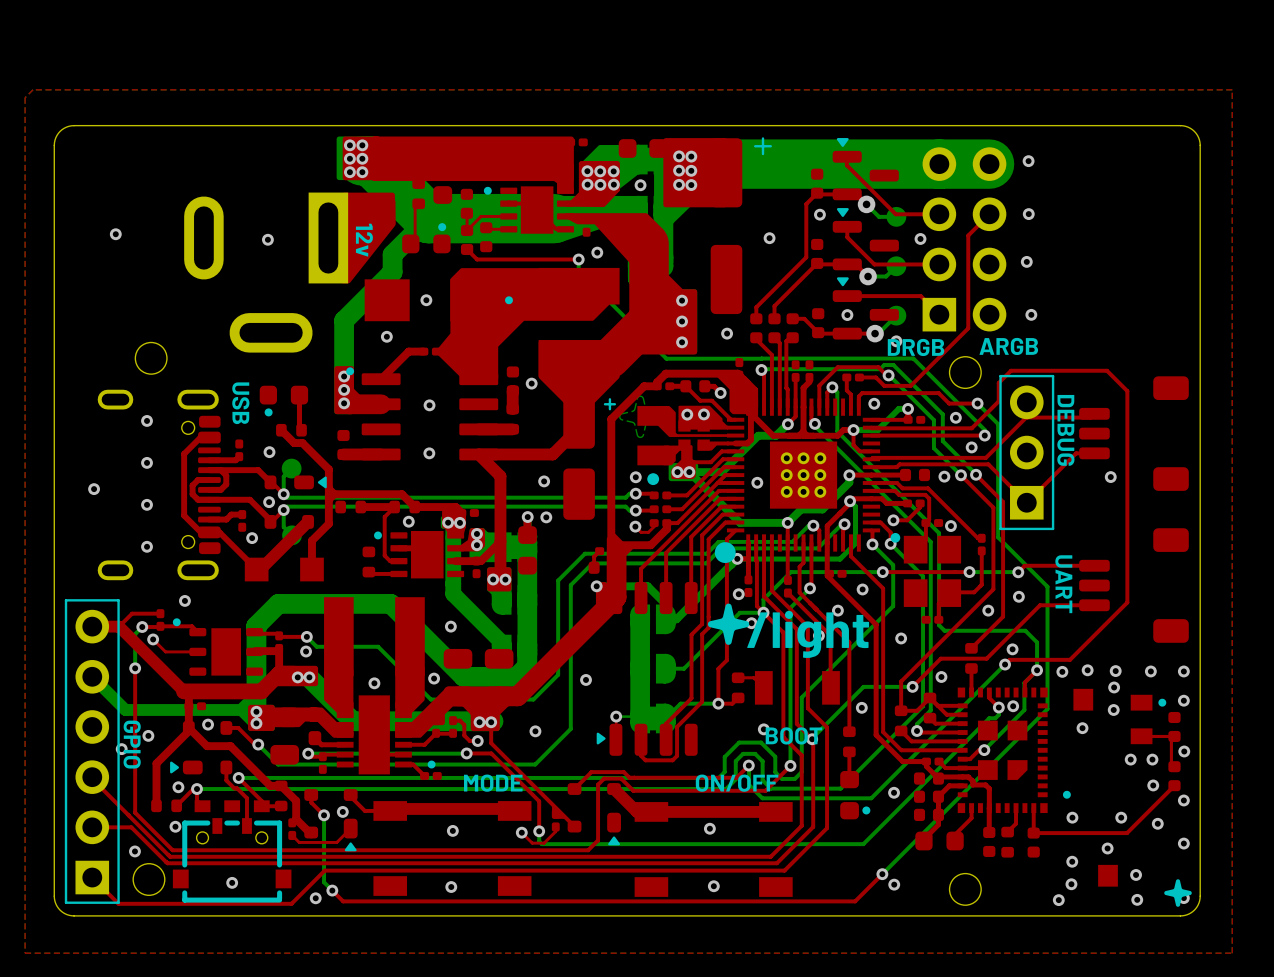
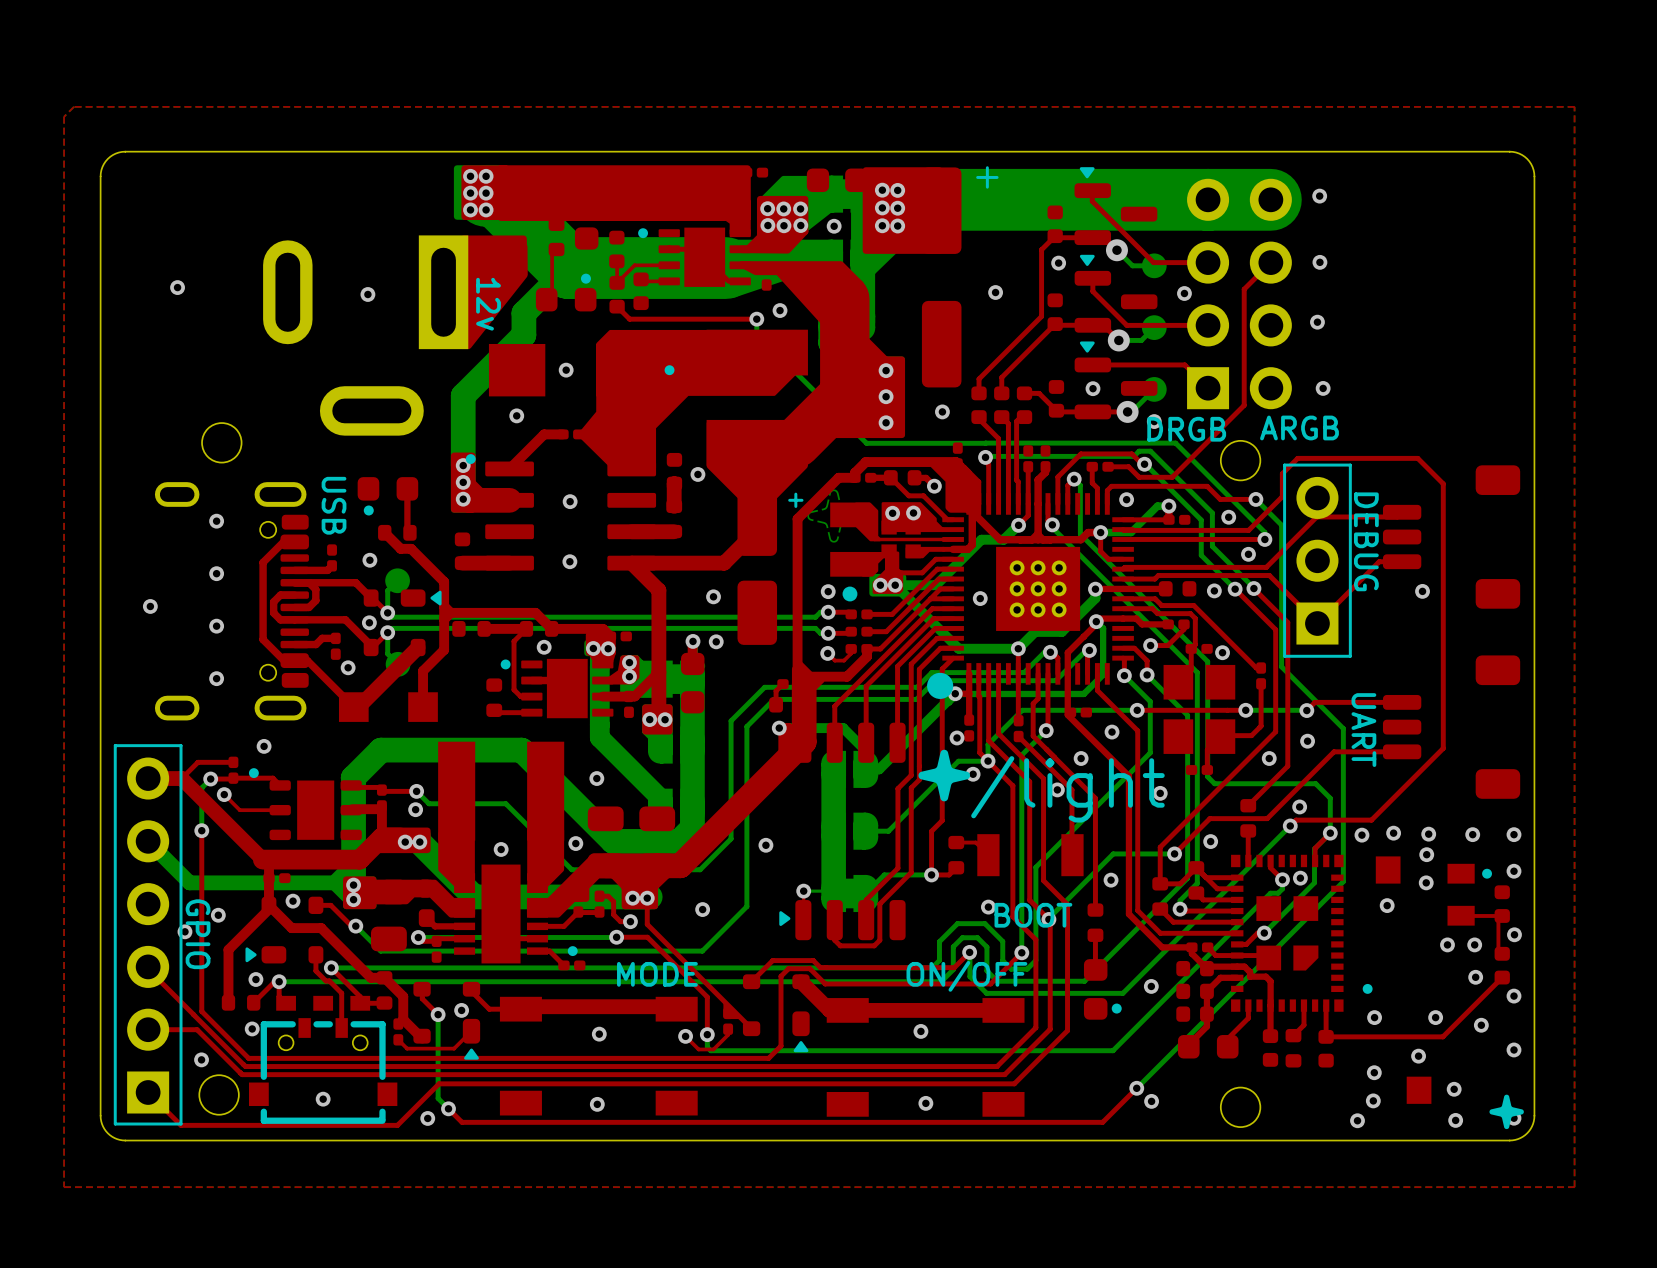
part footprint: [890, 532, 962, 607] -> [1163, 664, 1236, 754]

